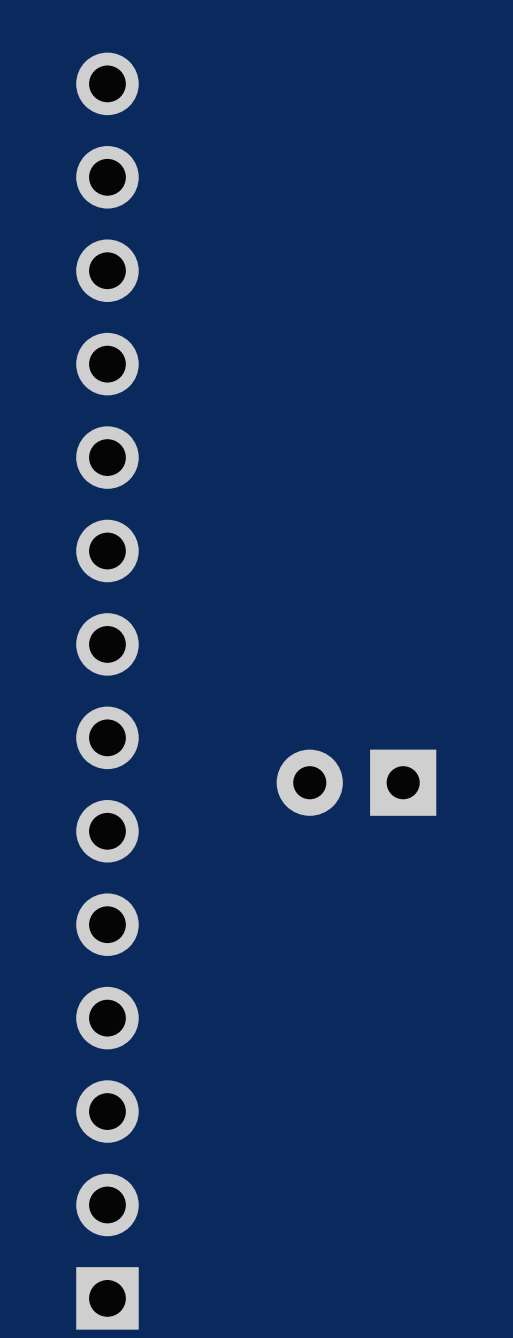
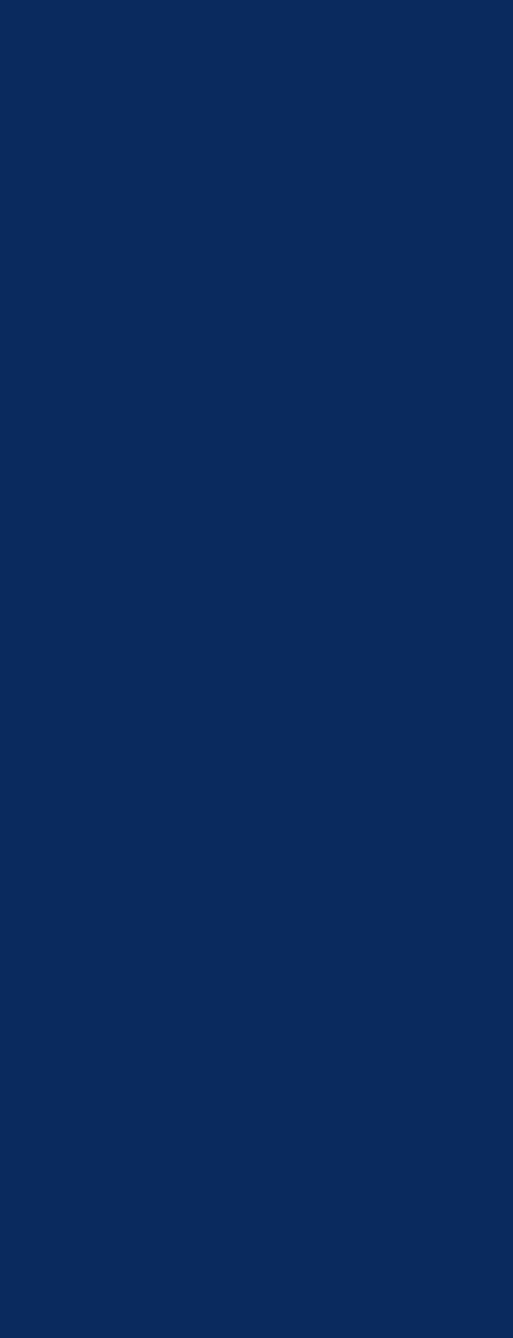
part: (107, 691) -> none
part: (356, 782) -> none

